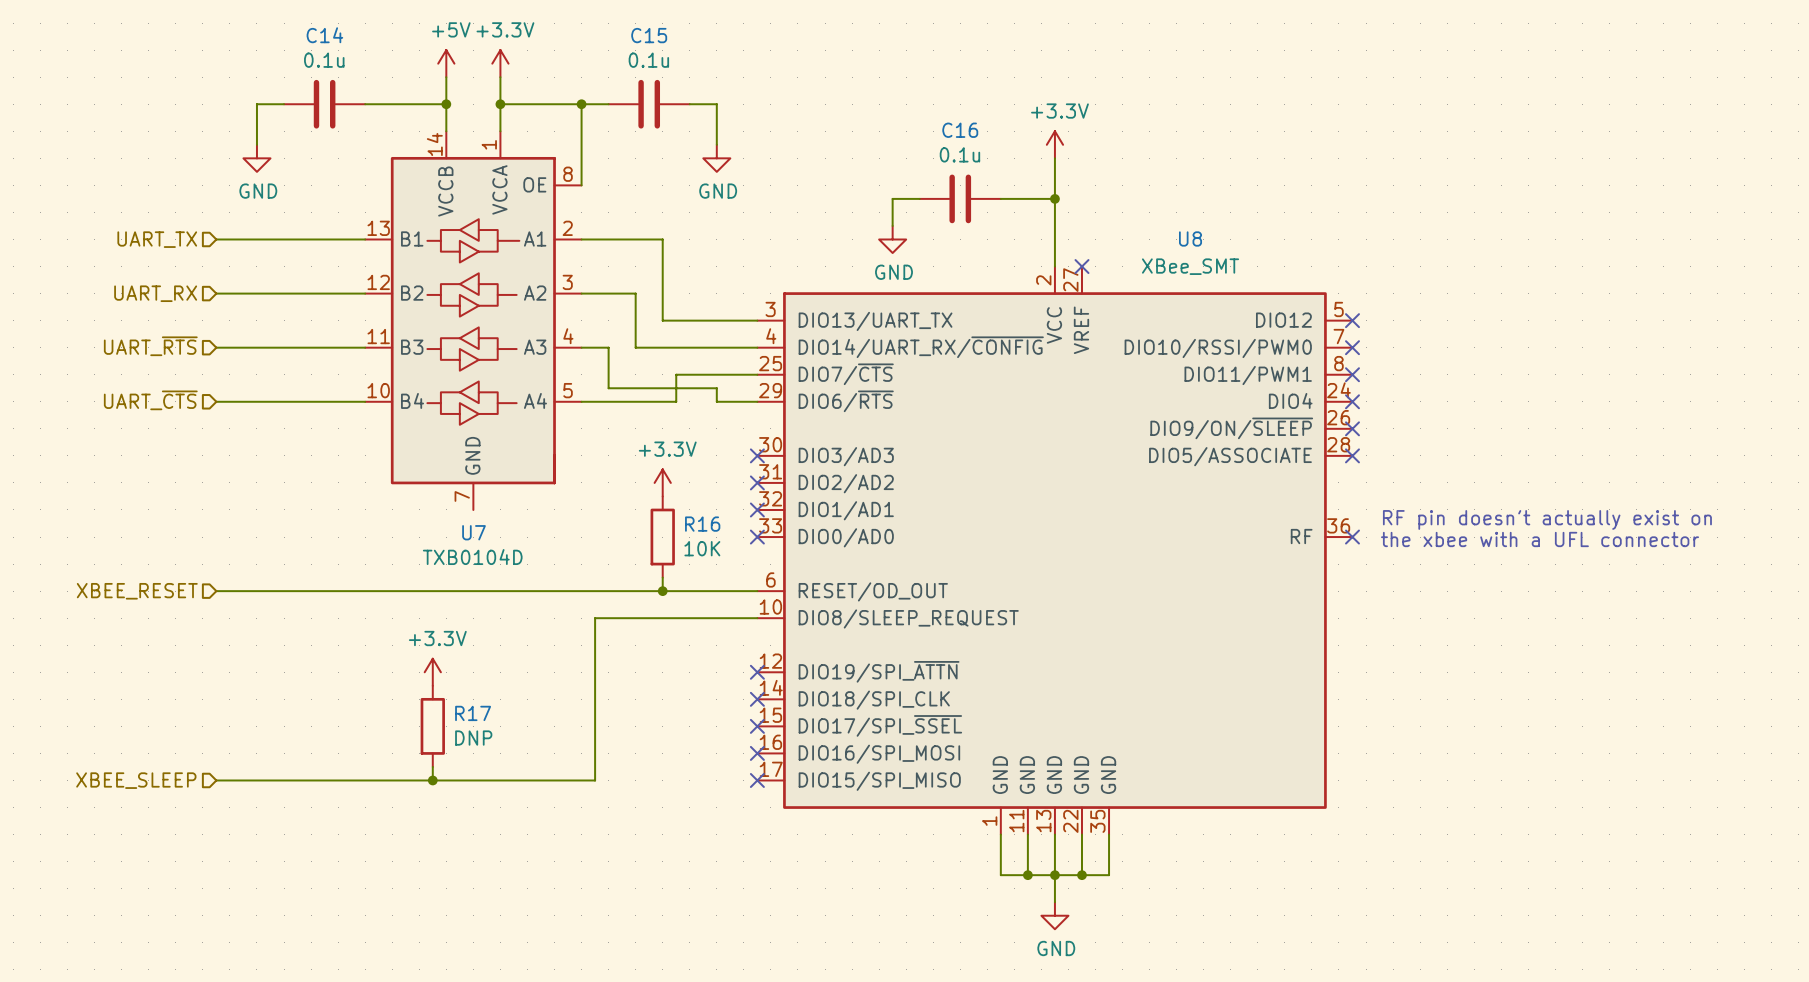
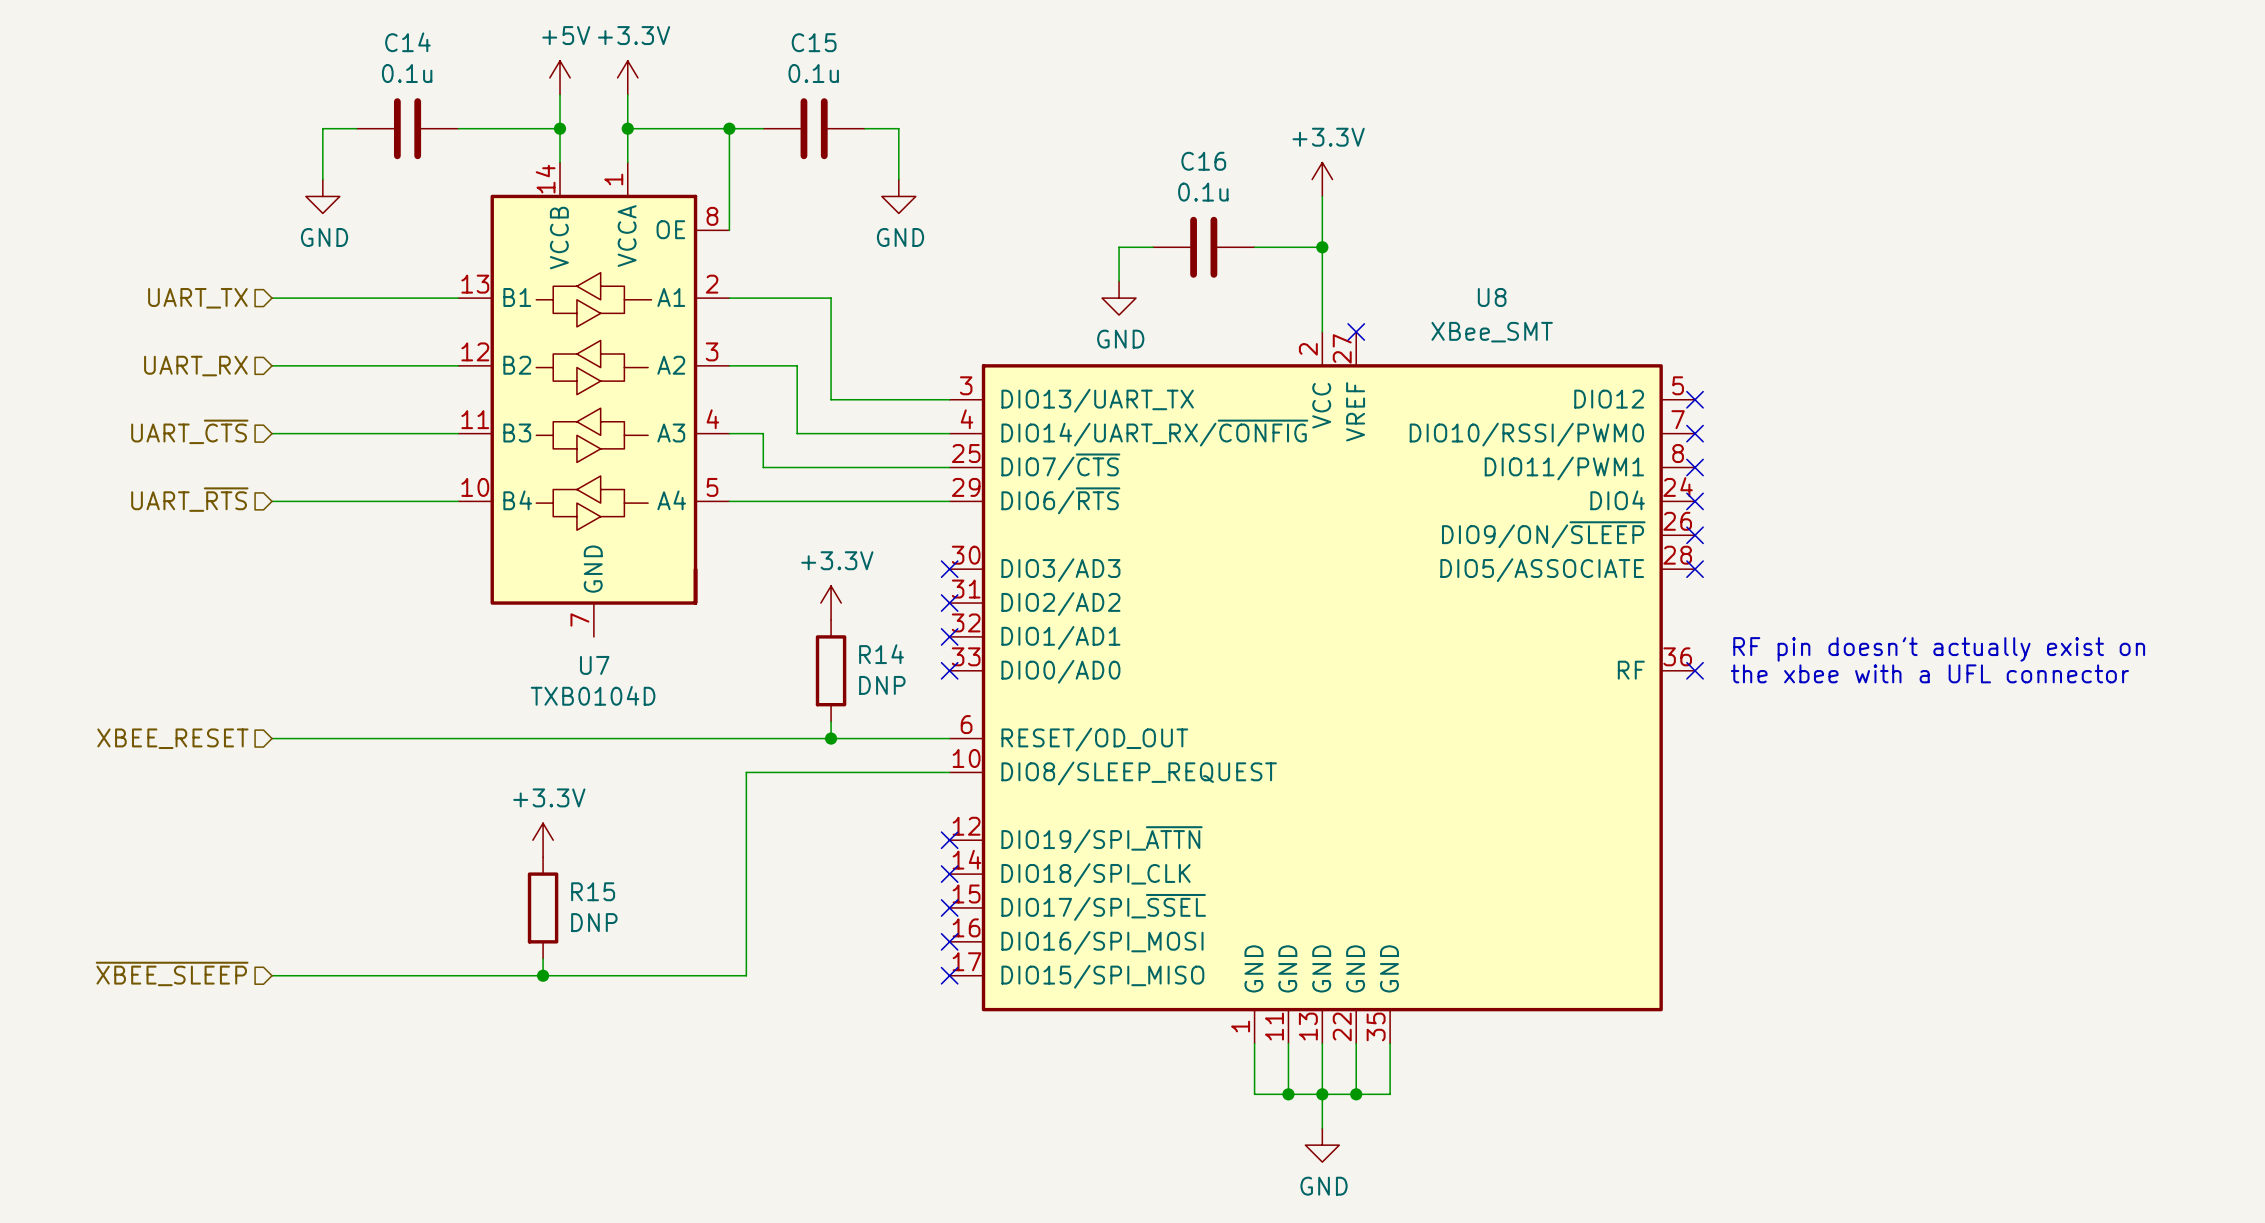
hierarchical label: UART_~{RTS} (150, 346) -> UART_~{CTS} (189, 431)
wire: (608, 374) (608, 388) (716, 388) (716, 401) -> (763, 467) (847, 467)
wire: (676, 374) (676, 401) -> (898, 501) (847, 501)
hierarchical label: UART_~{CTS} (150, 400) -> UART_~{RTS} (189, 499)
R16 name: R16 (702, 524) -> R14 (881, 654)
R16 value: 10K (702, 548) -> DNP (882, 685)
R17 name: R17 (473, 713) -> R15 (593, 891)
hierarchical label: XBEE_SLEEP (136, 780) -> ~{XBEE_SLEEP} (172, 973)

